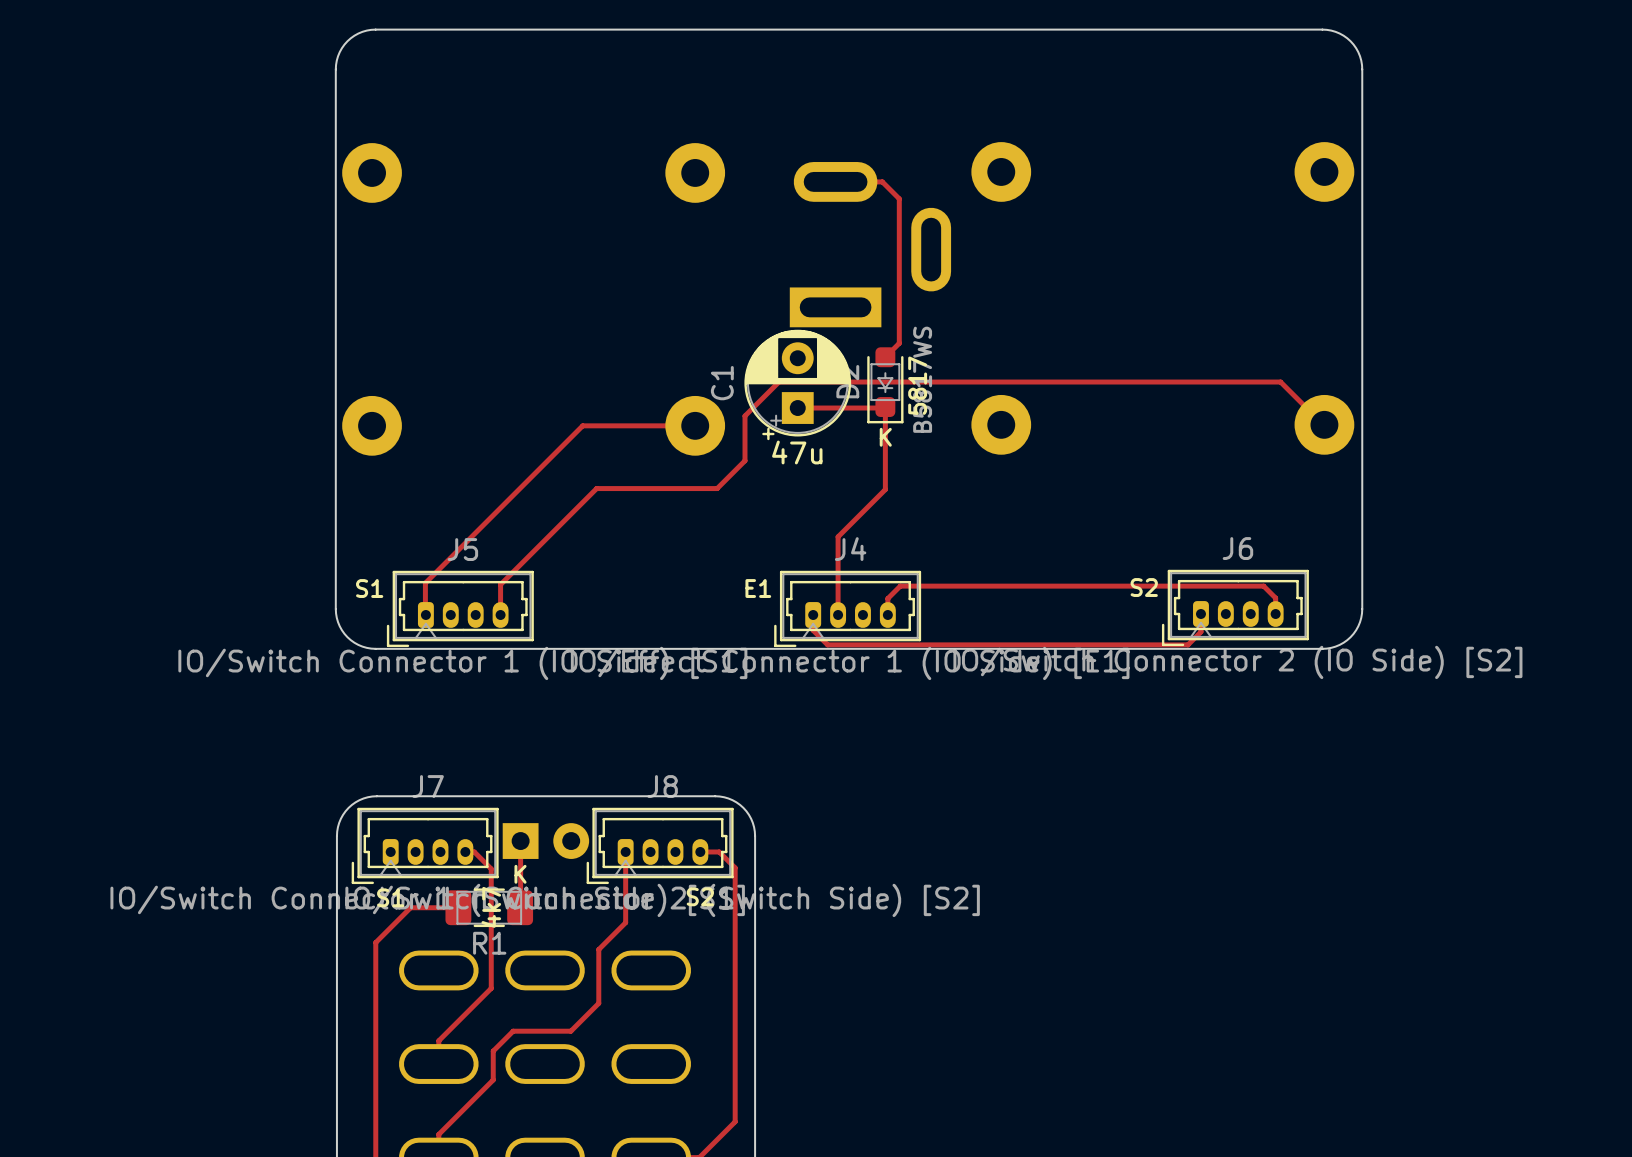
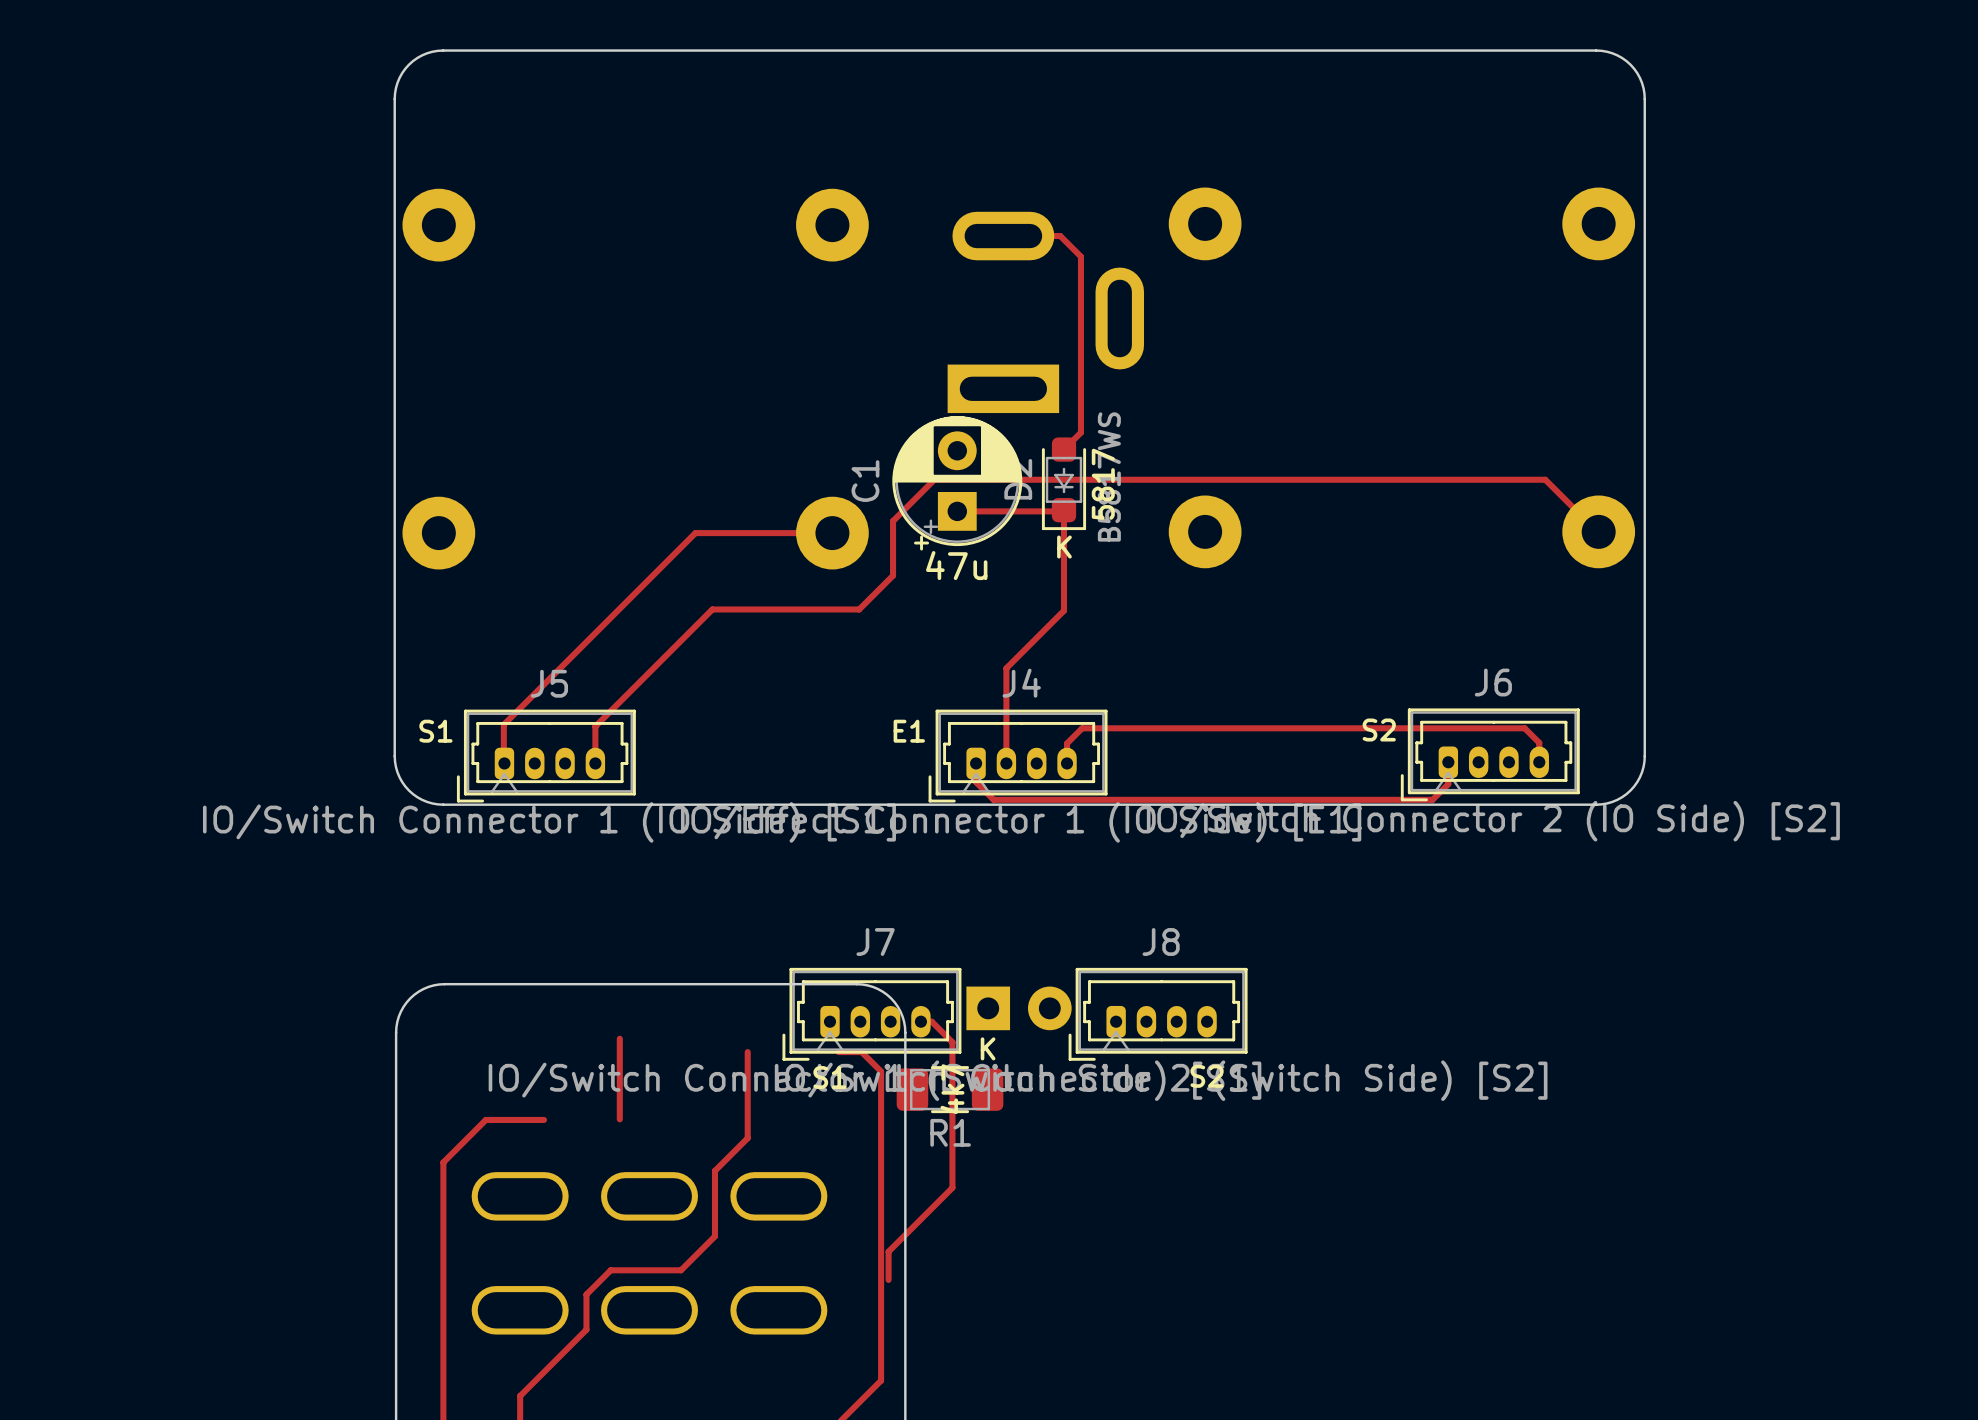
part position: (545, 841) -> (1019, 1008)
J7 position: (425, 845) -> (871, 1014)
J8 position: (660, 845) -> (1158, 1014)
track: (465, 851) (474, 851) (491, 868) (491, 988) (438, 1040) (438, 1064) -> (920, 1021) (931, 1021) (952, 1042) (952, 1187) (888, 1251) (888, 1279)
R1 position: (489, 907) -> (950, 1089)

